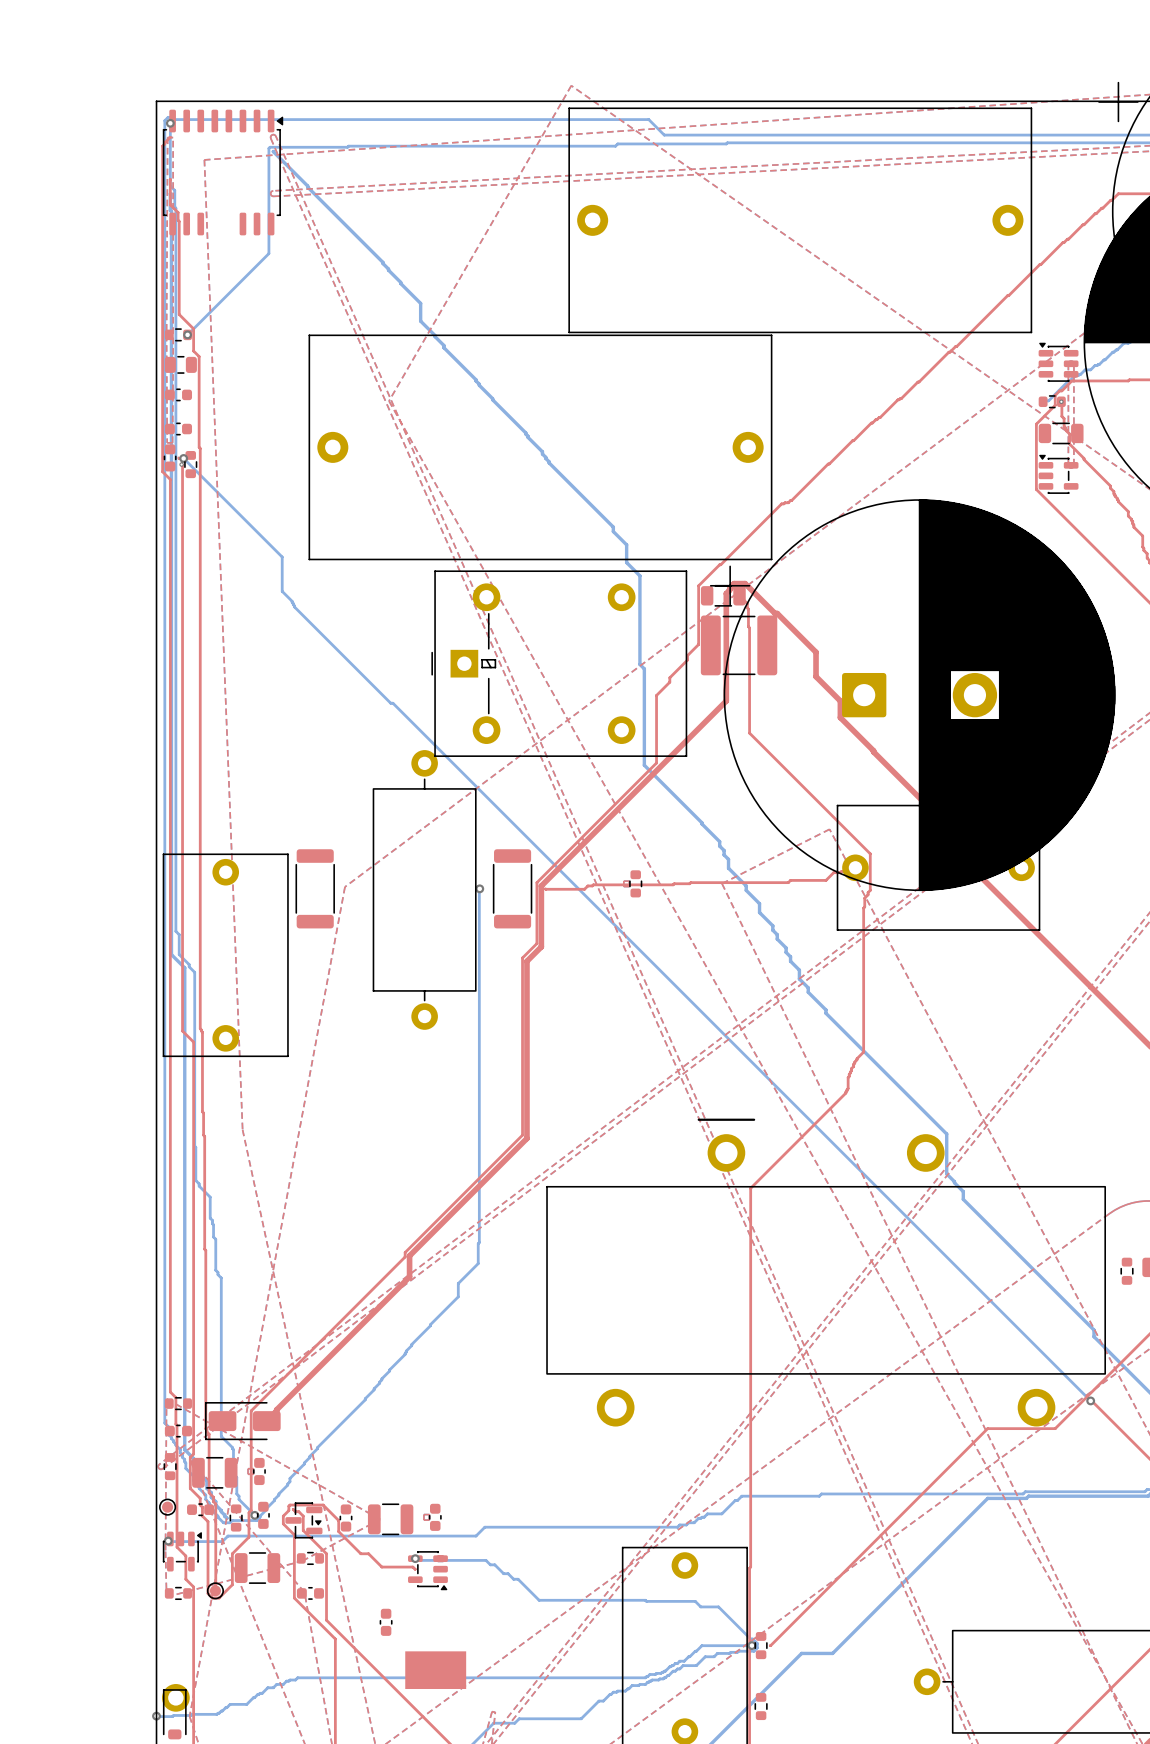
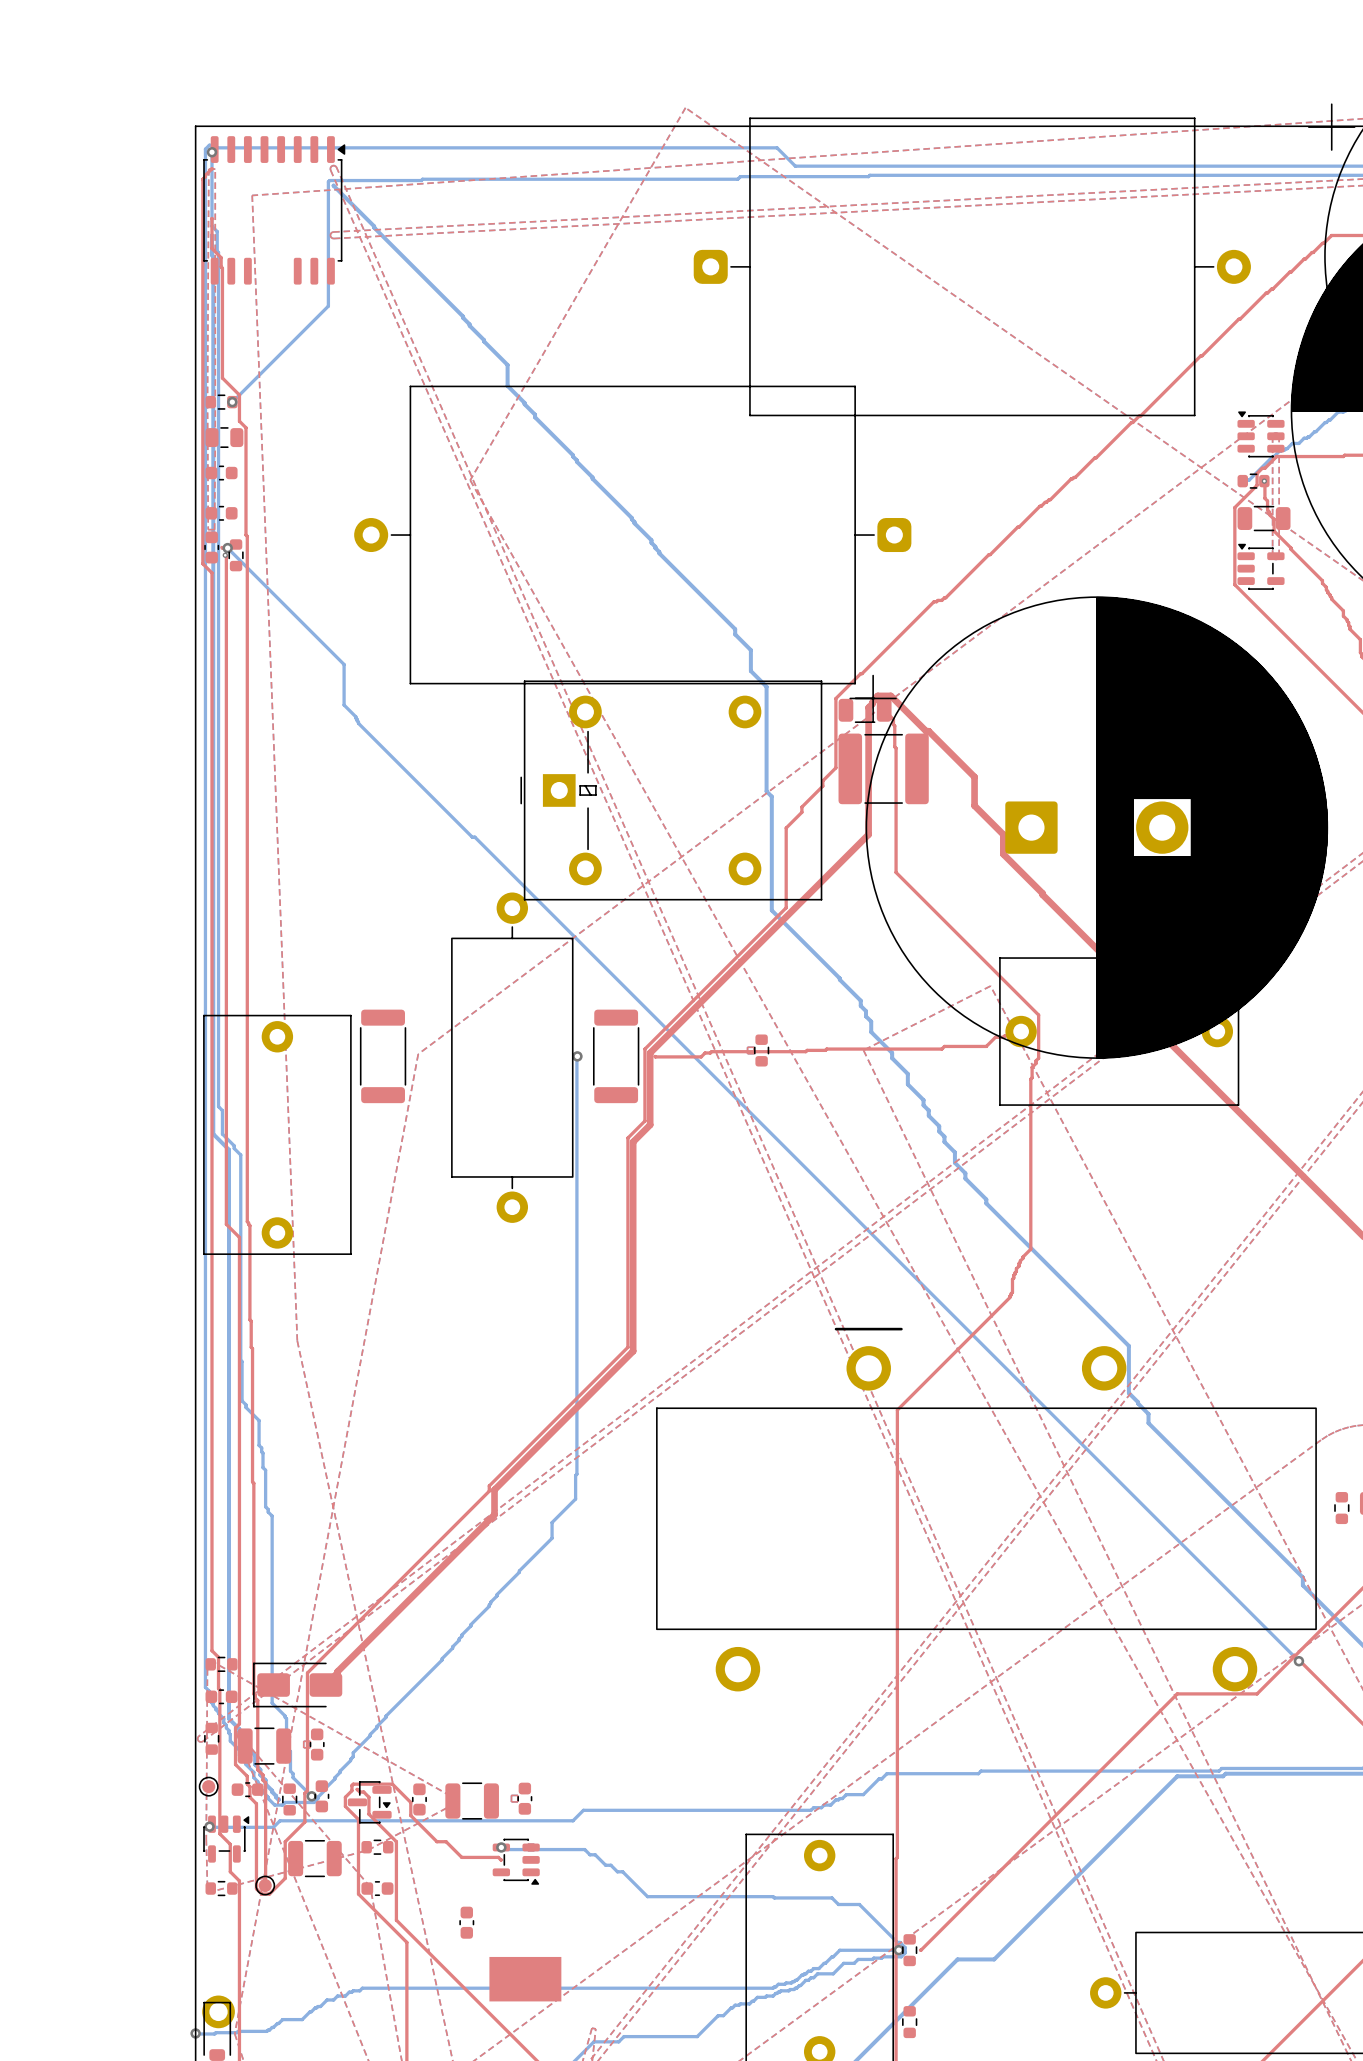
part: (800, 220) -> none
part: none -> (972, 266)
part: none -> (632, 535)
part: (540, 447) -> none

